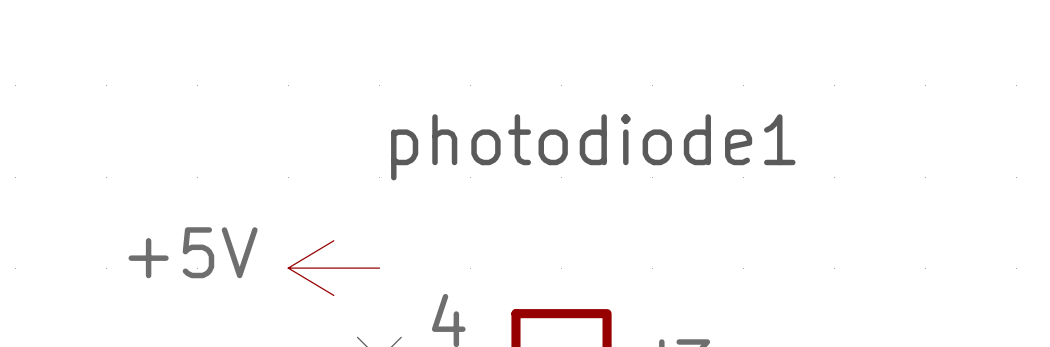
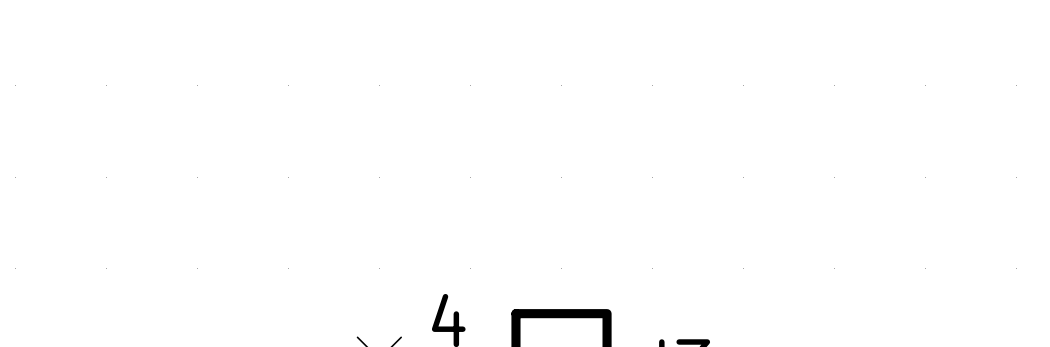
text: photodiode1 (593, 147) -> none
power symbol: +5V (333, 268) -> none

